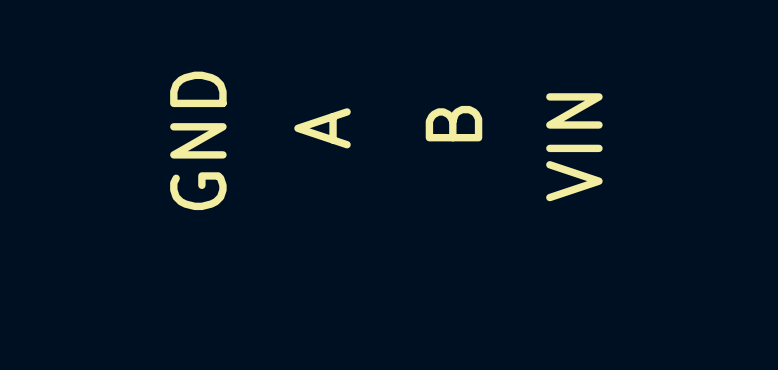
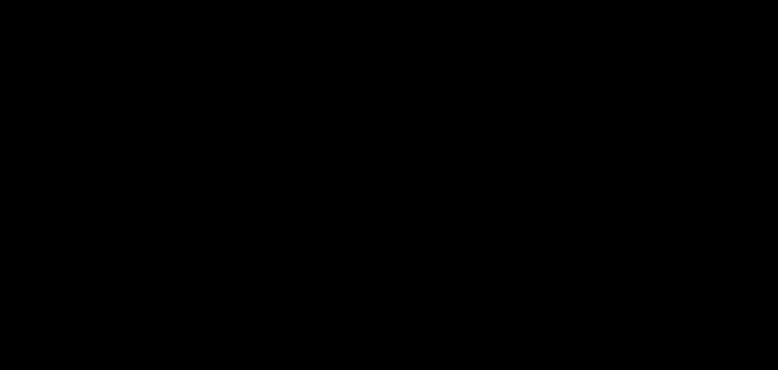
text: B (453, 123) -> none
text: A (322, 128) -> none
text: GND (198, 140) -> none
text: VIN (574, 147) -> none

